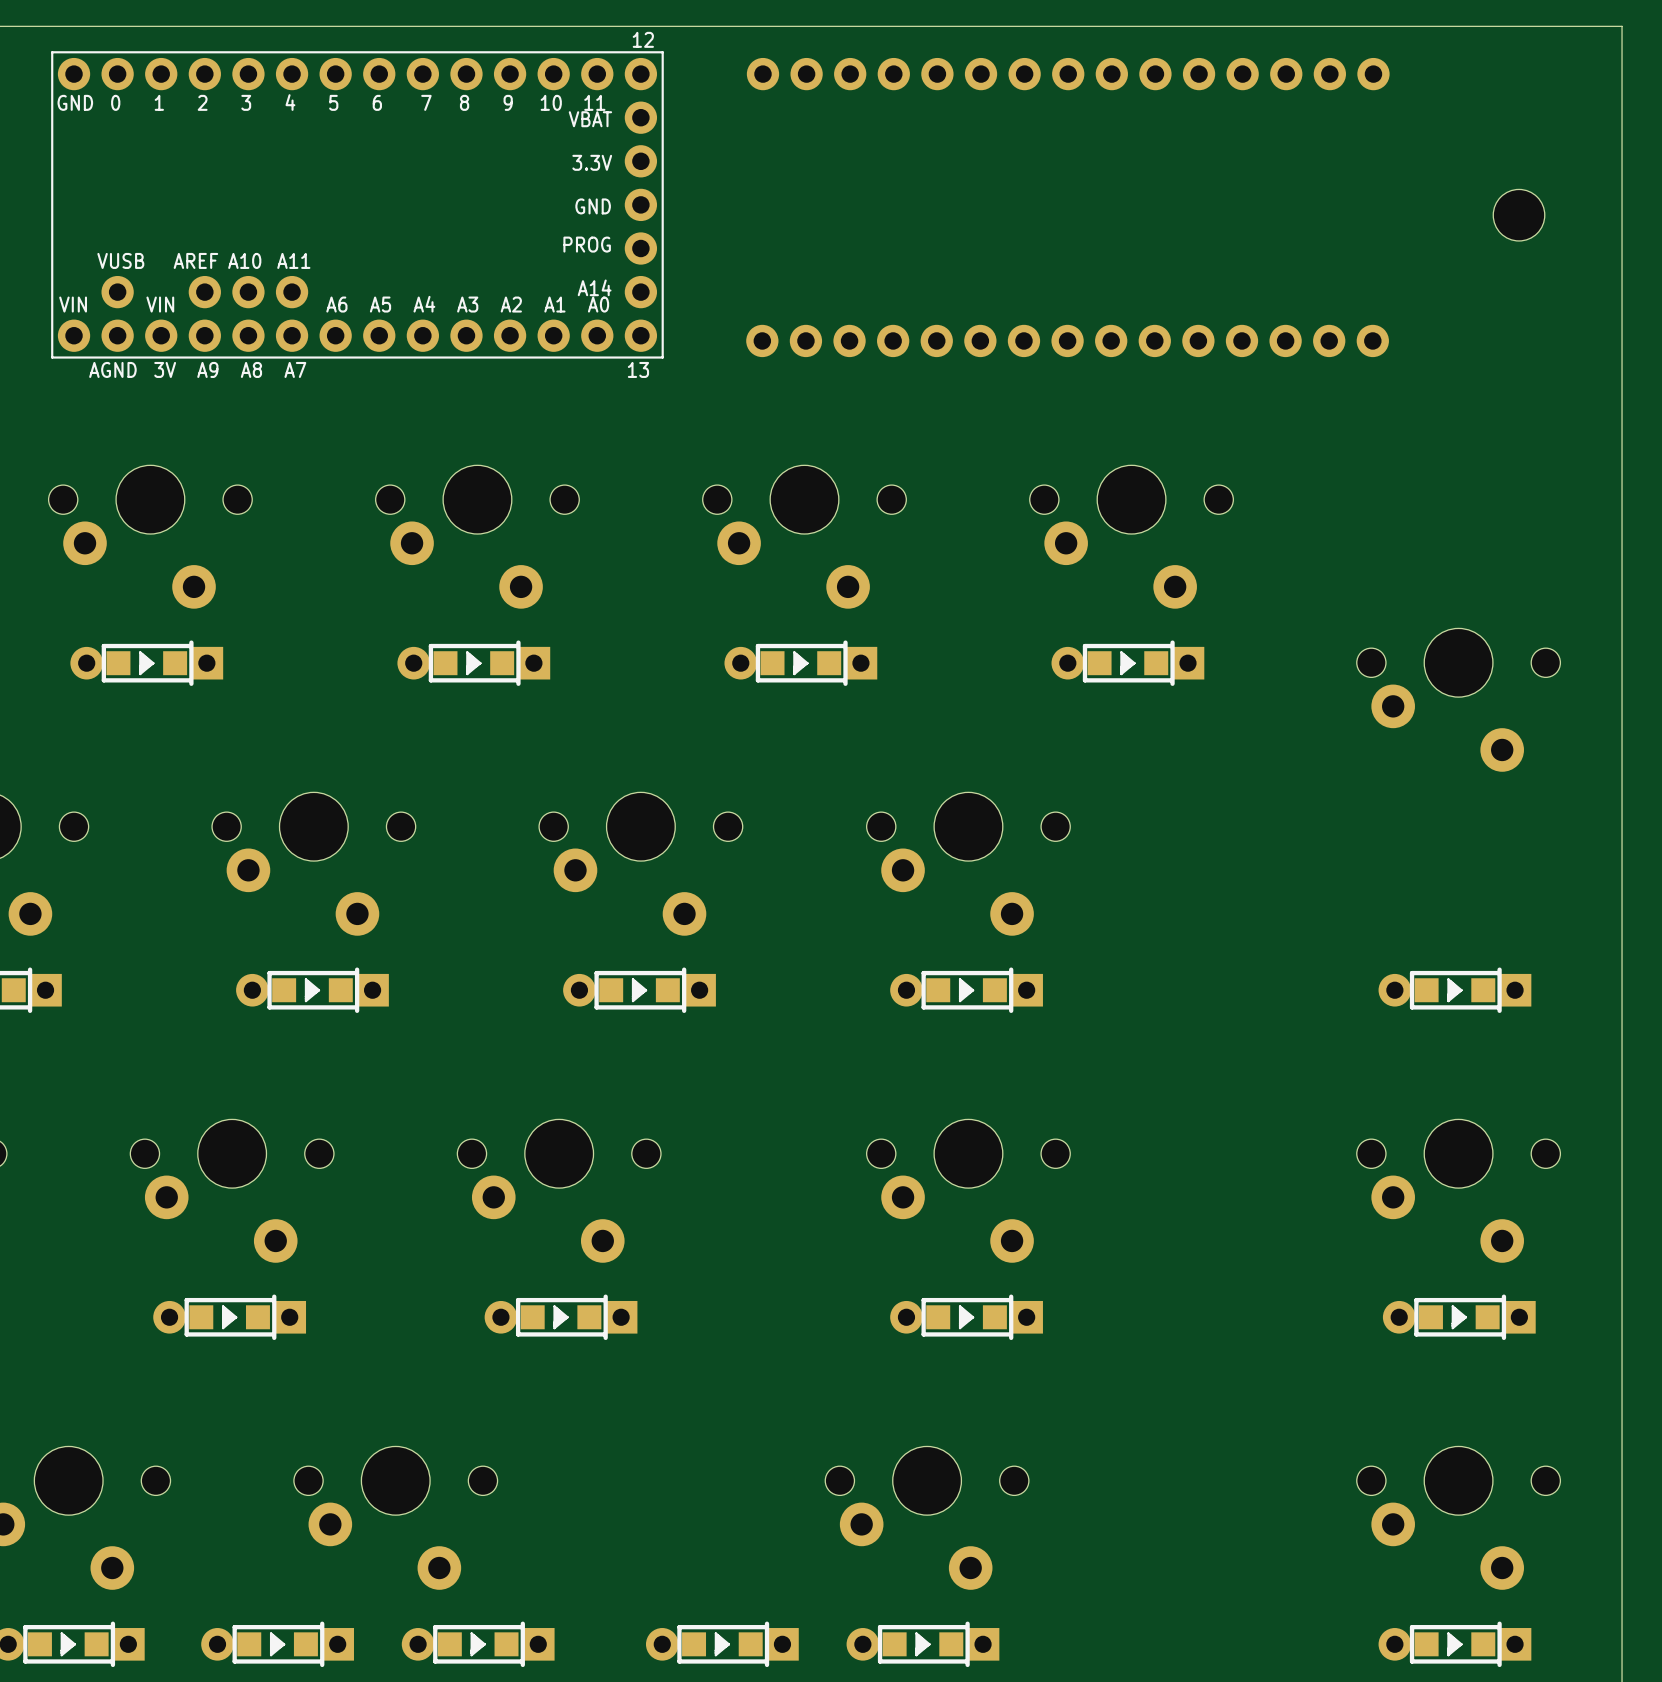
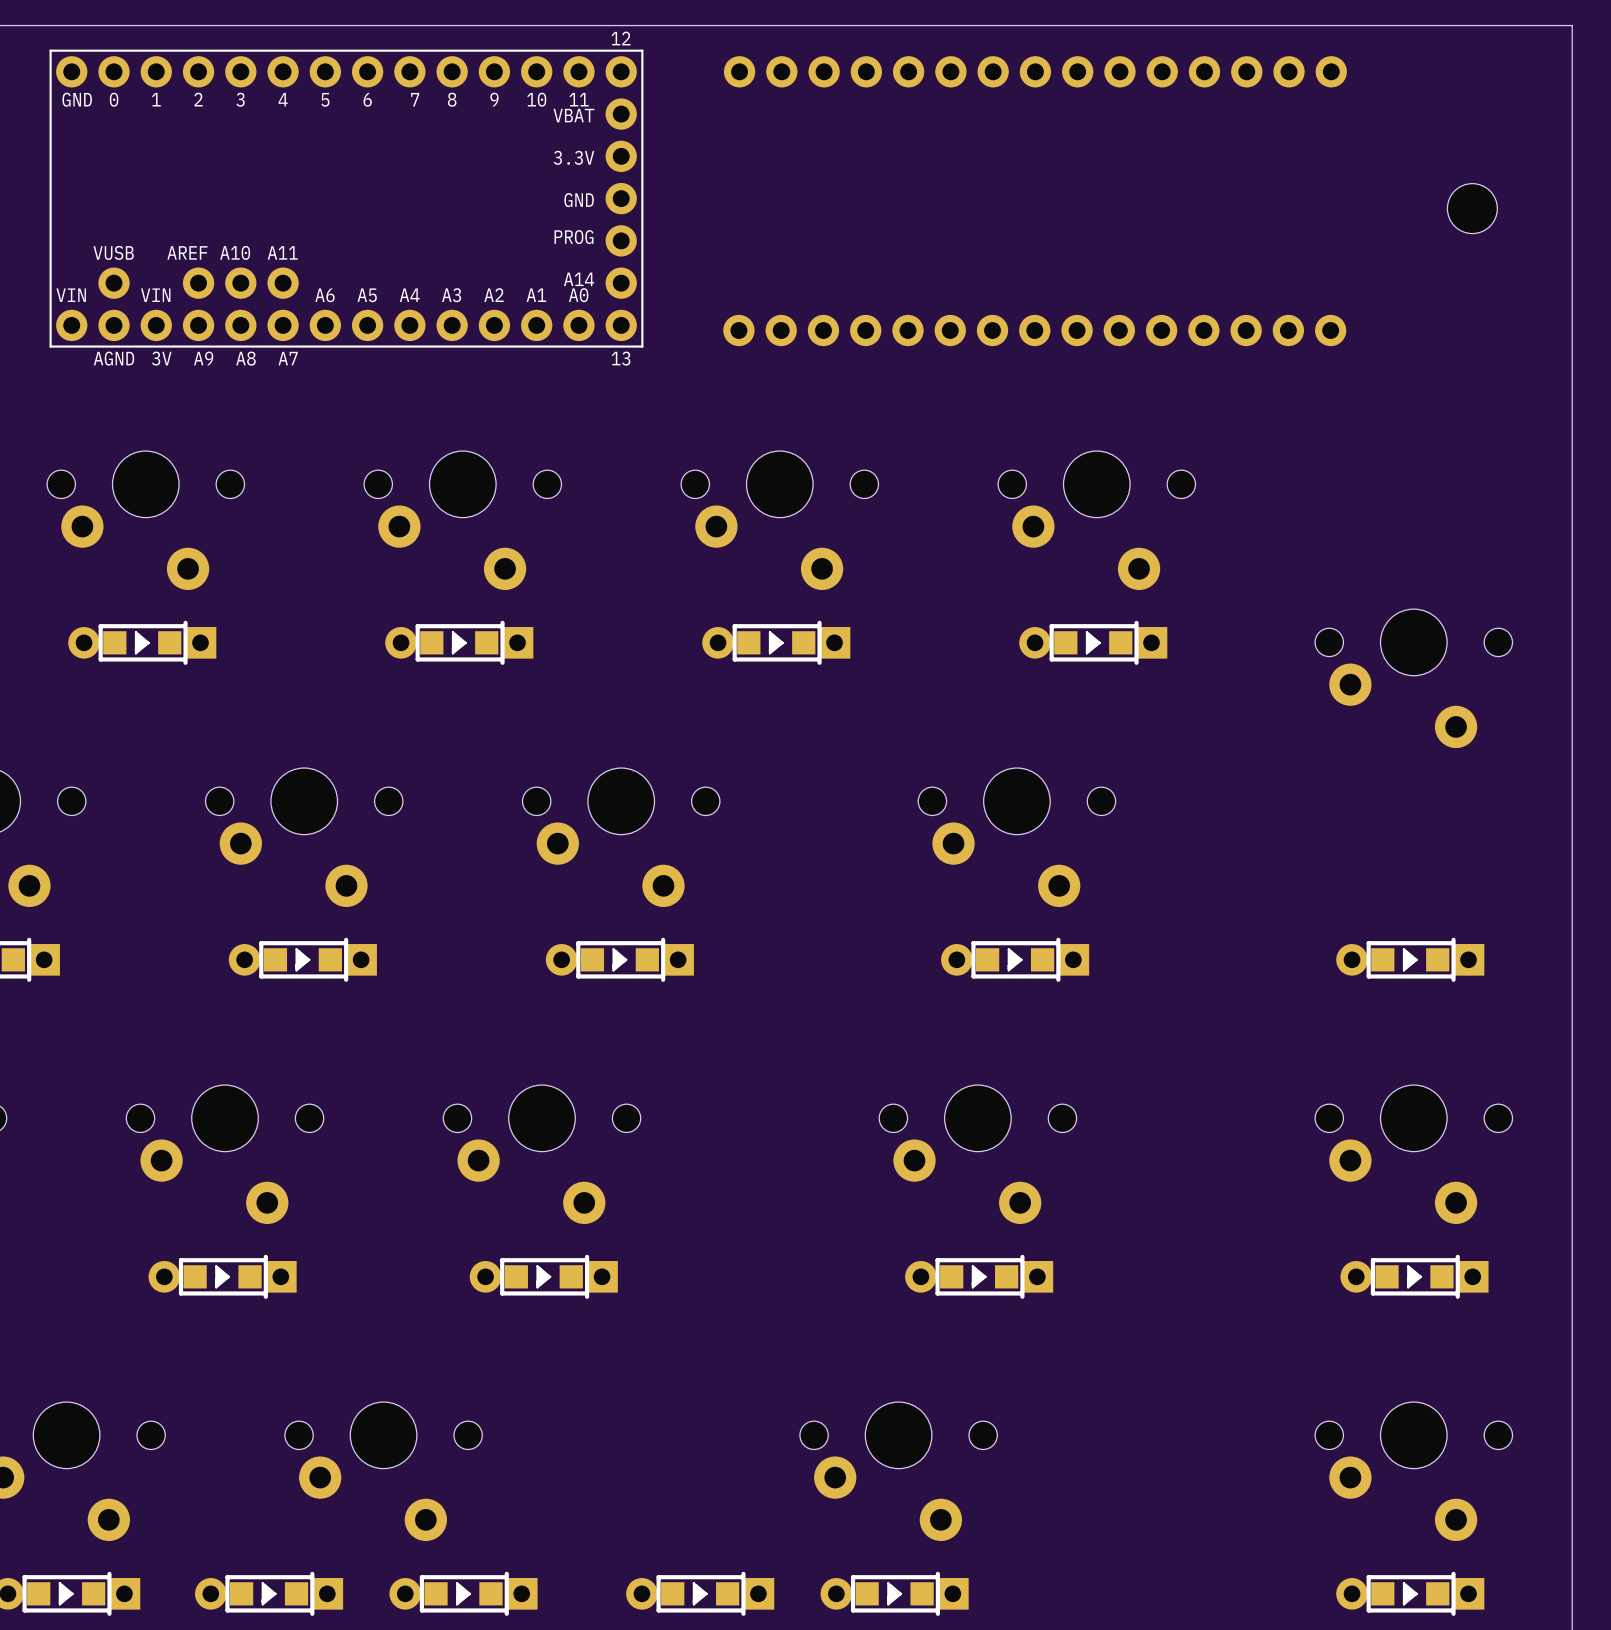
part position: (968, 864) -> (1016, 837)
part position: (966, 990) -> (1015, 959)
part position: (968, 1191) -> (977, 1154)
part position: (966, 1317) -> (979, 1276)

